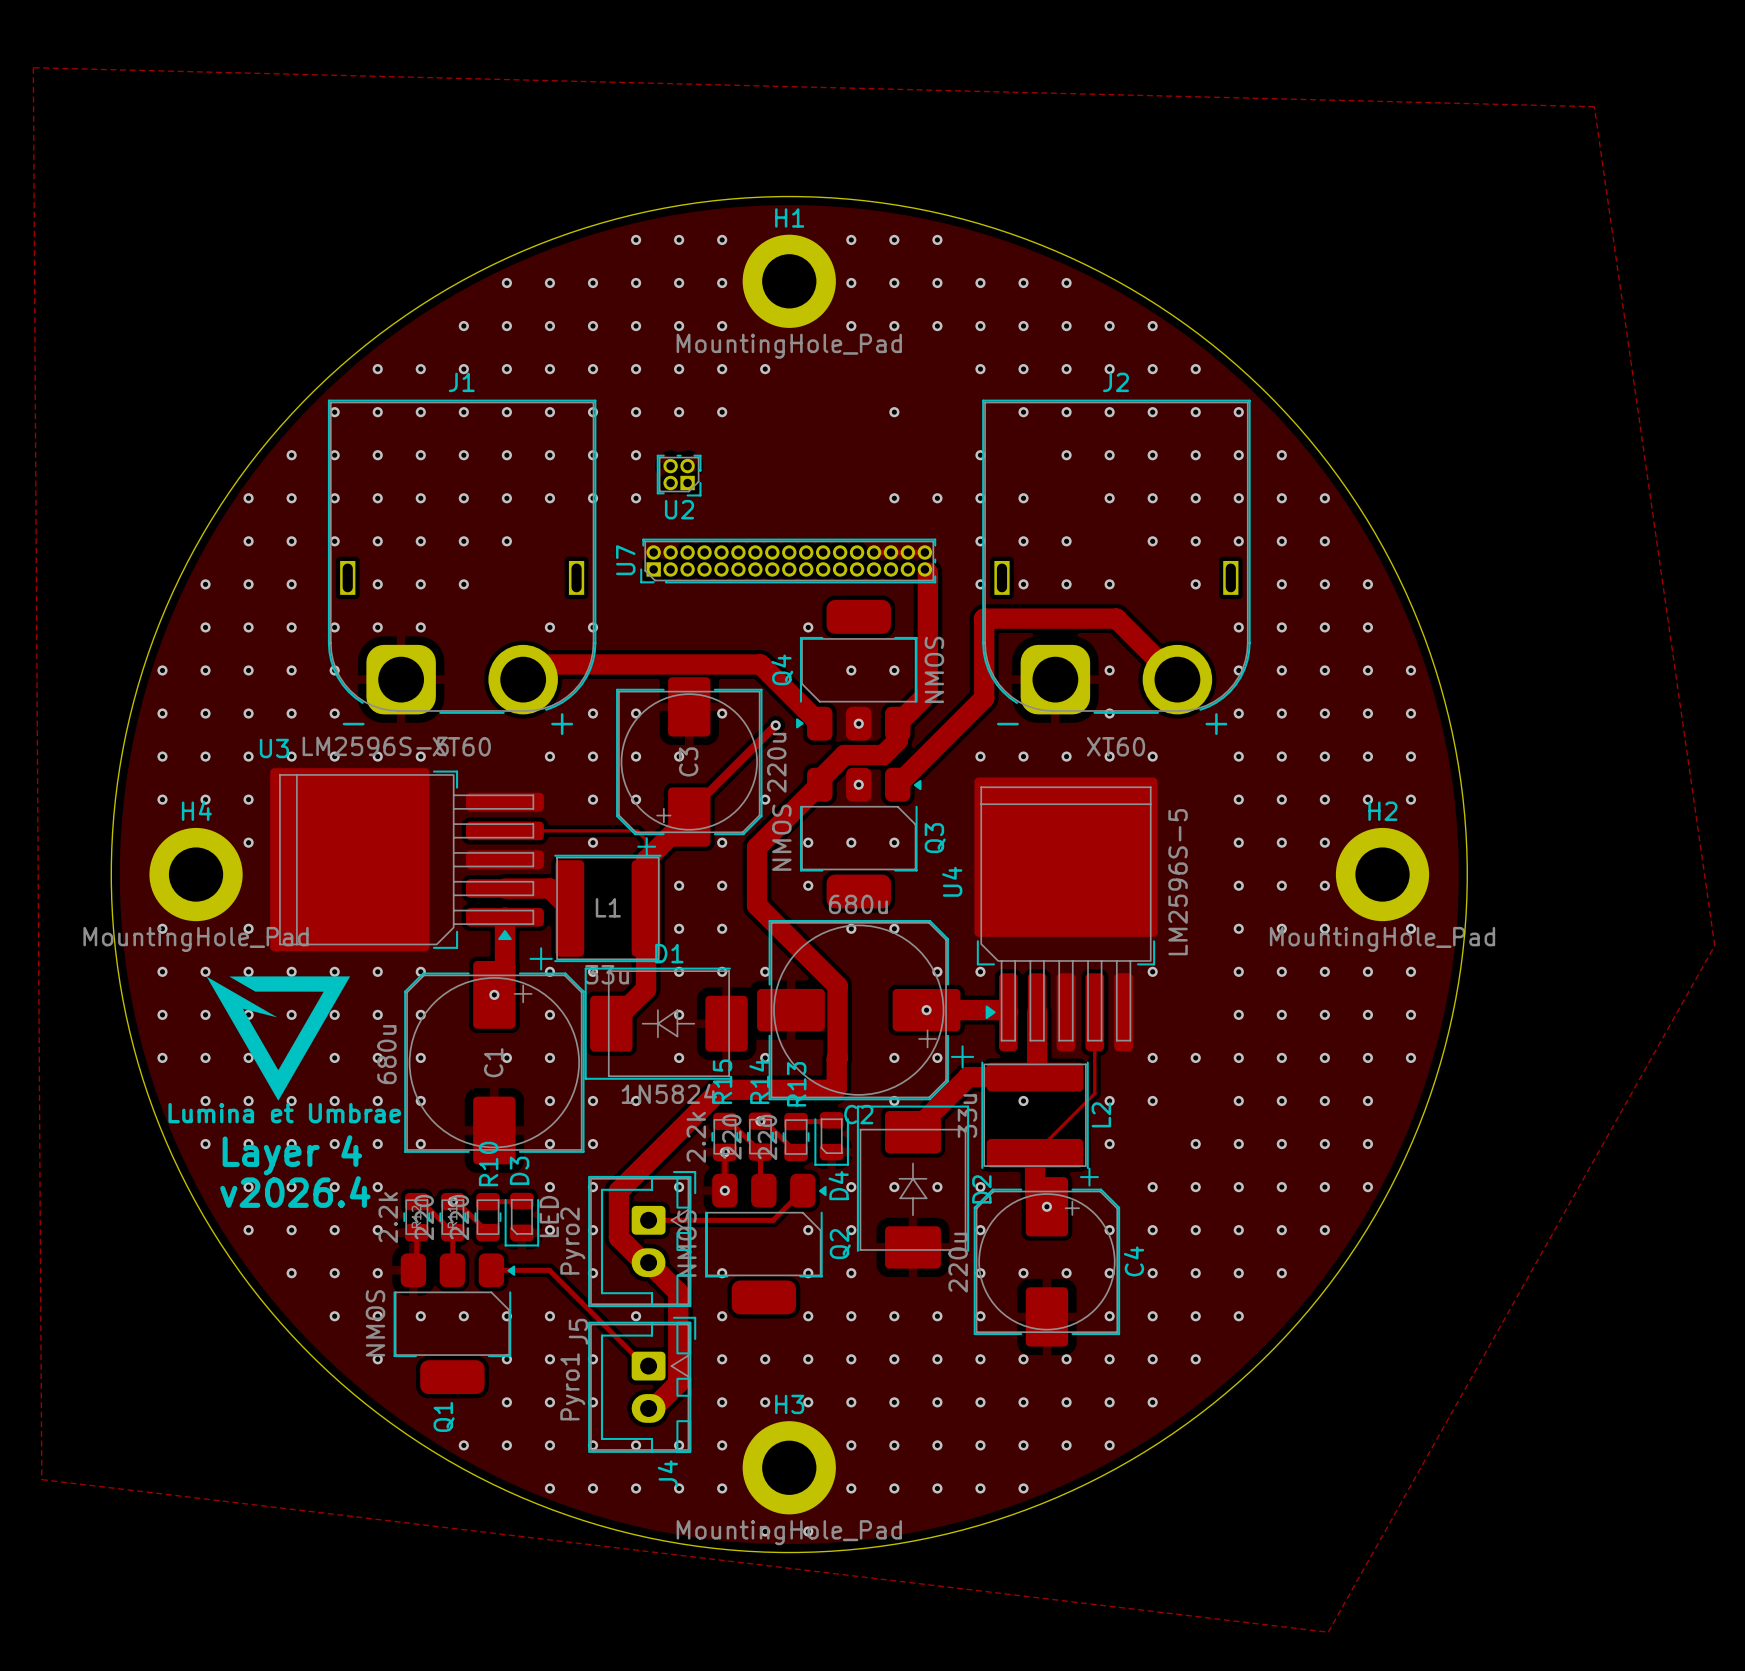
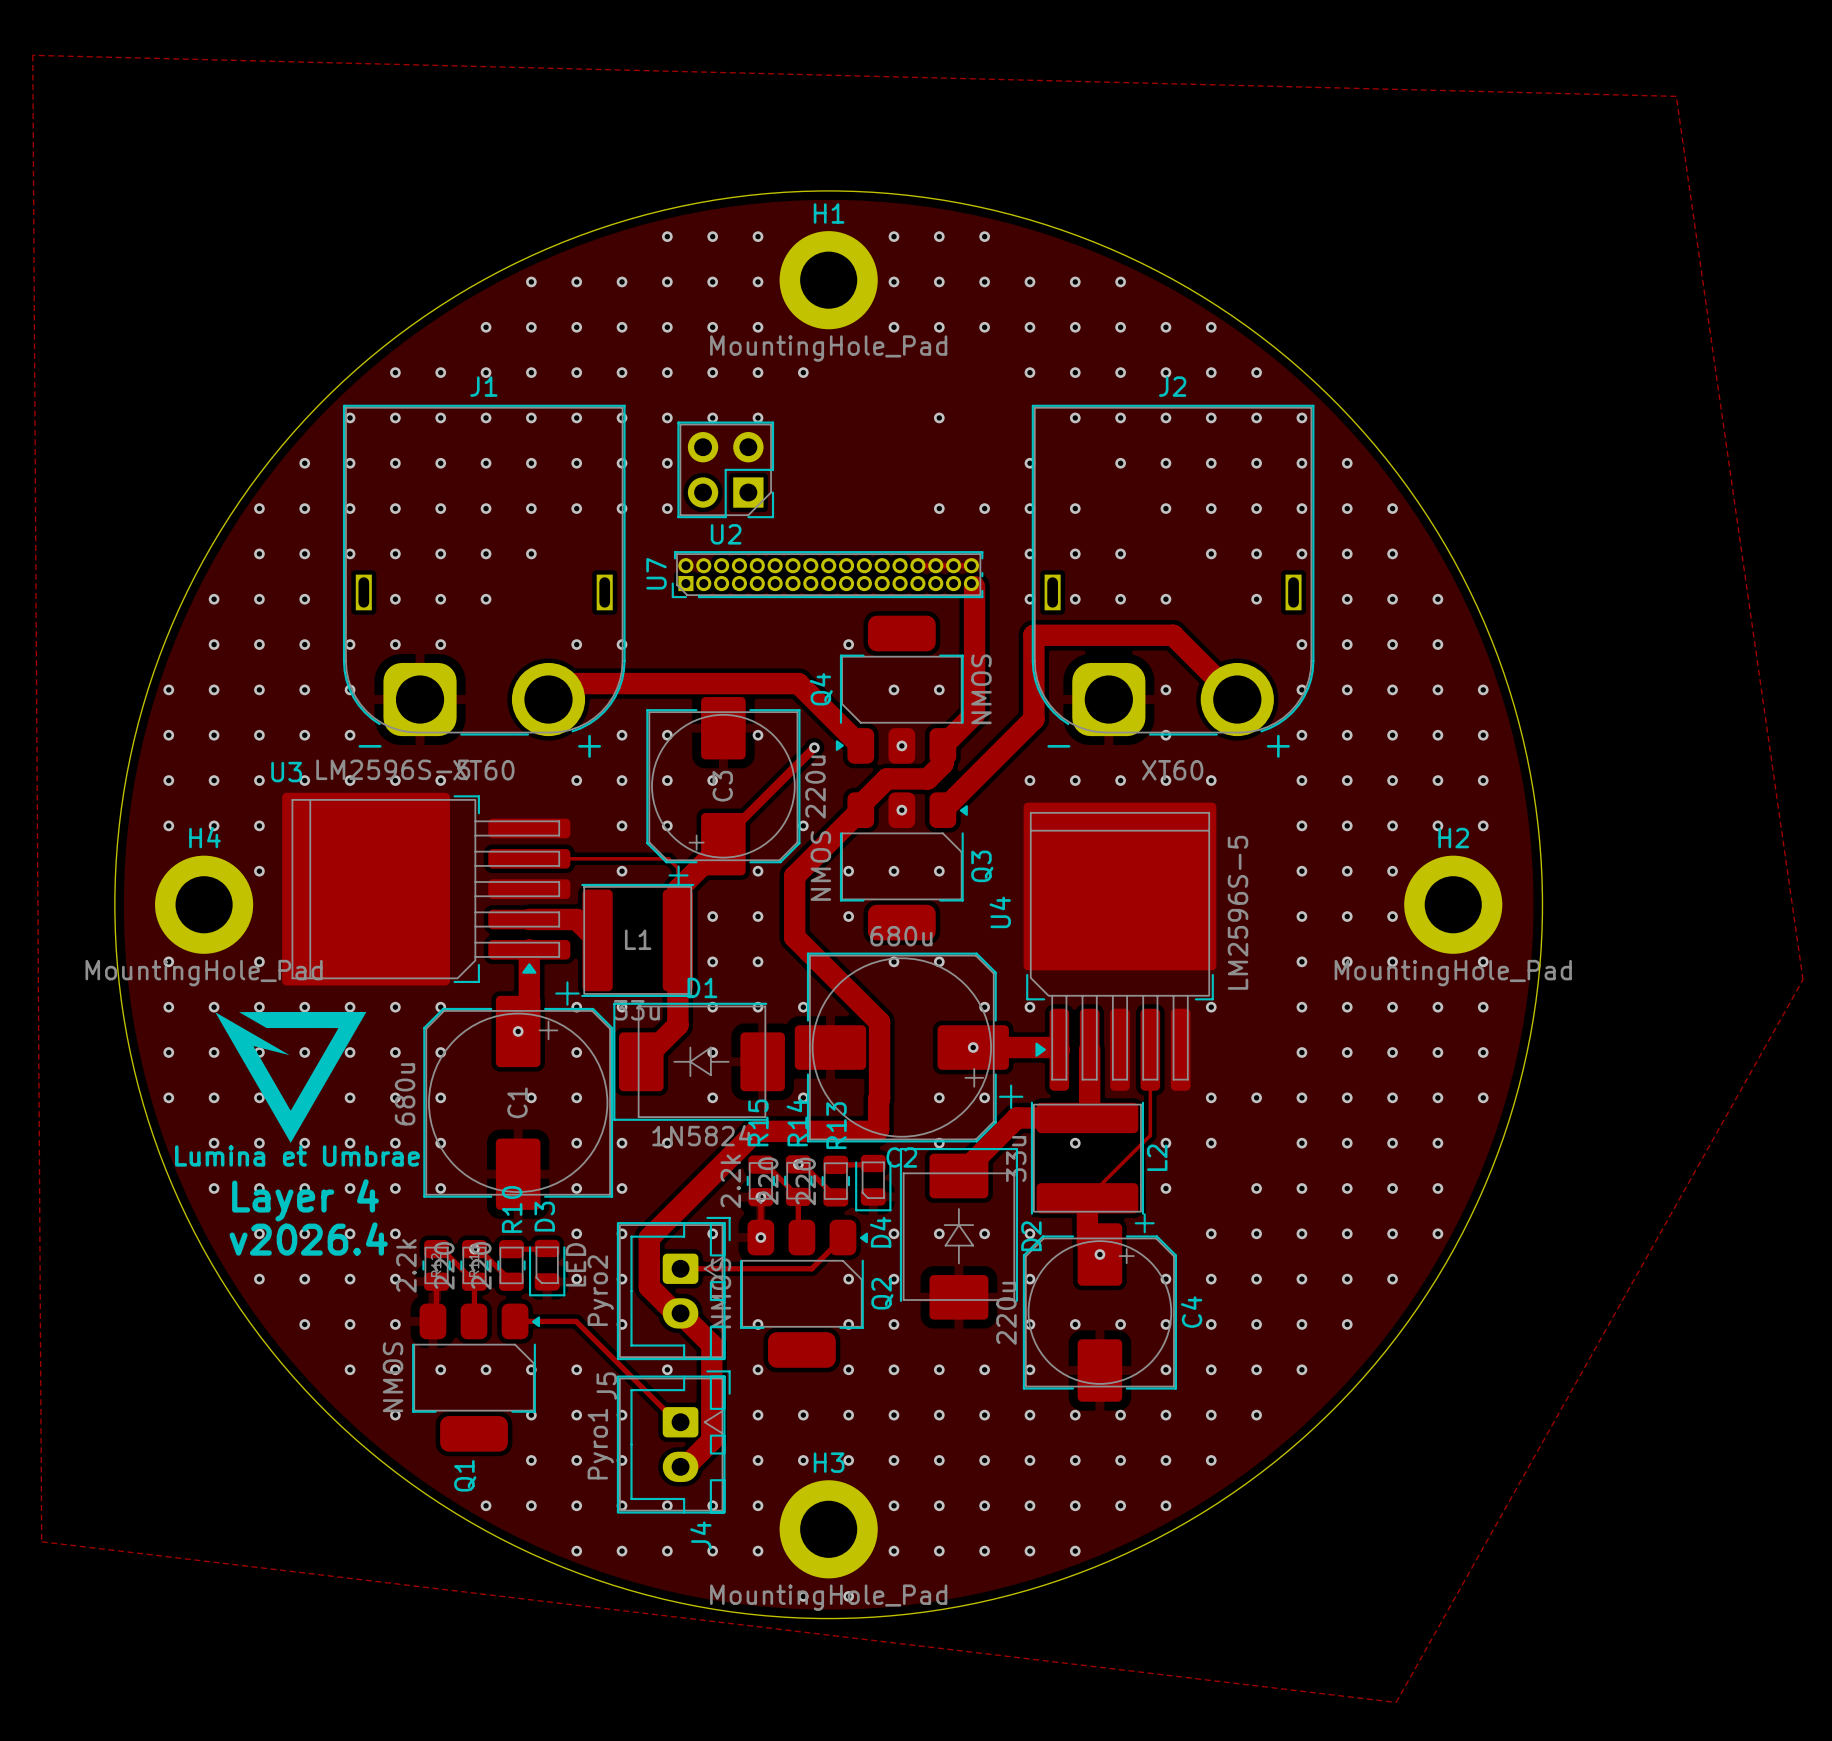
U2 footprint: [656, 454, 702, 497] -> [677, 421, 775, 519]

